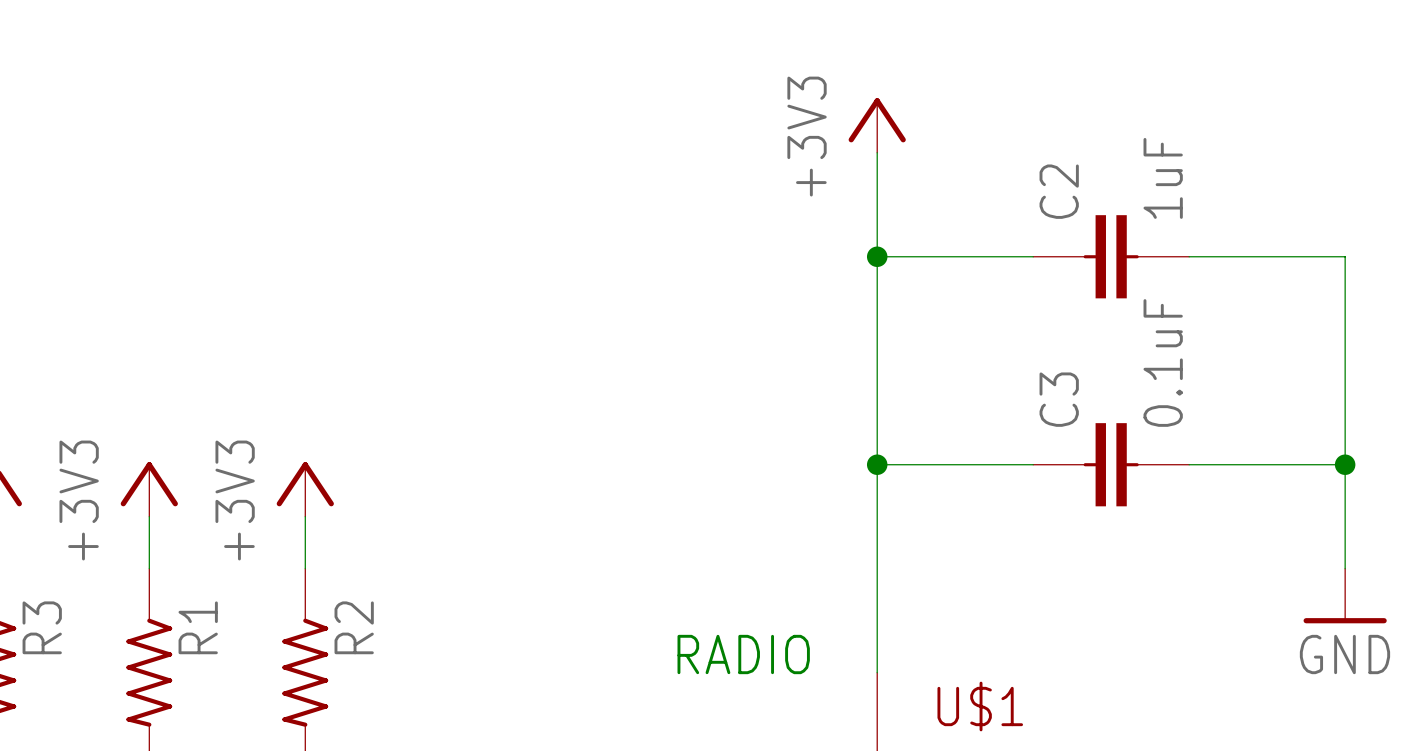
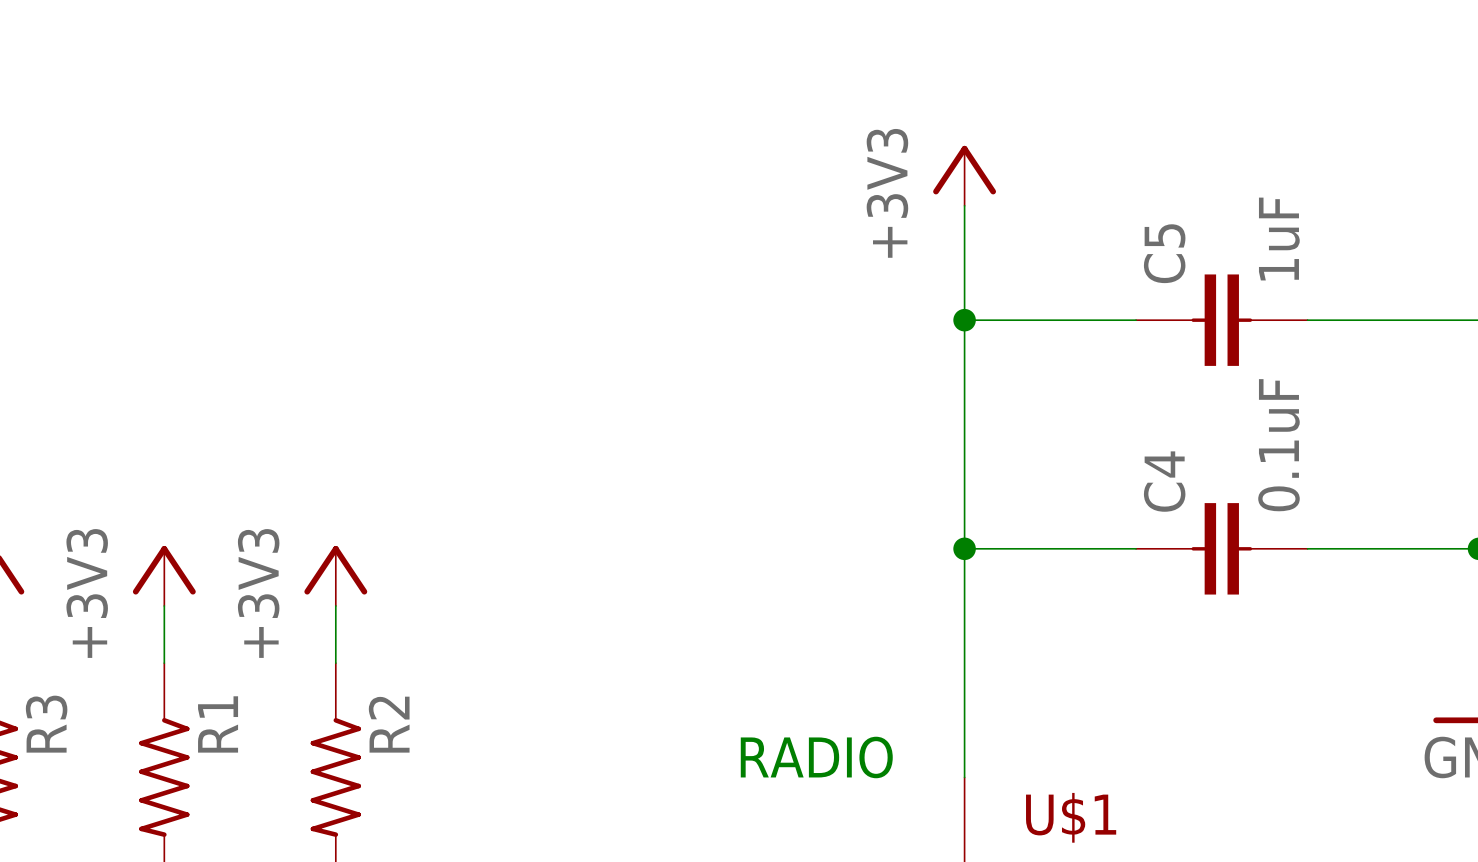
C2 name: C2 (1059, 191) -> C5 (1164, 253)
C3 name: C3 (1059, 399) -> C4 (1164, 481)

